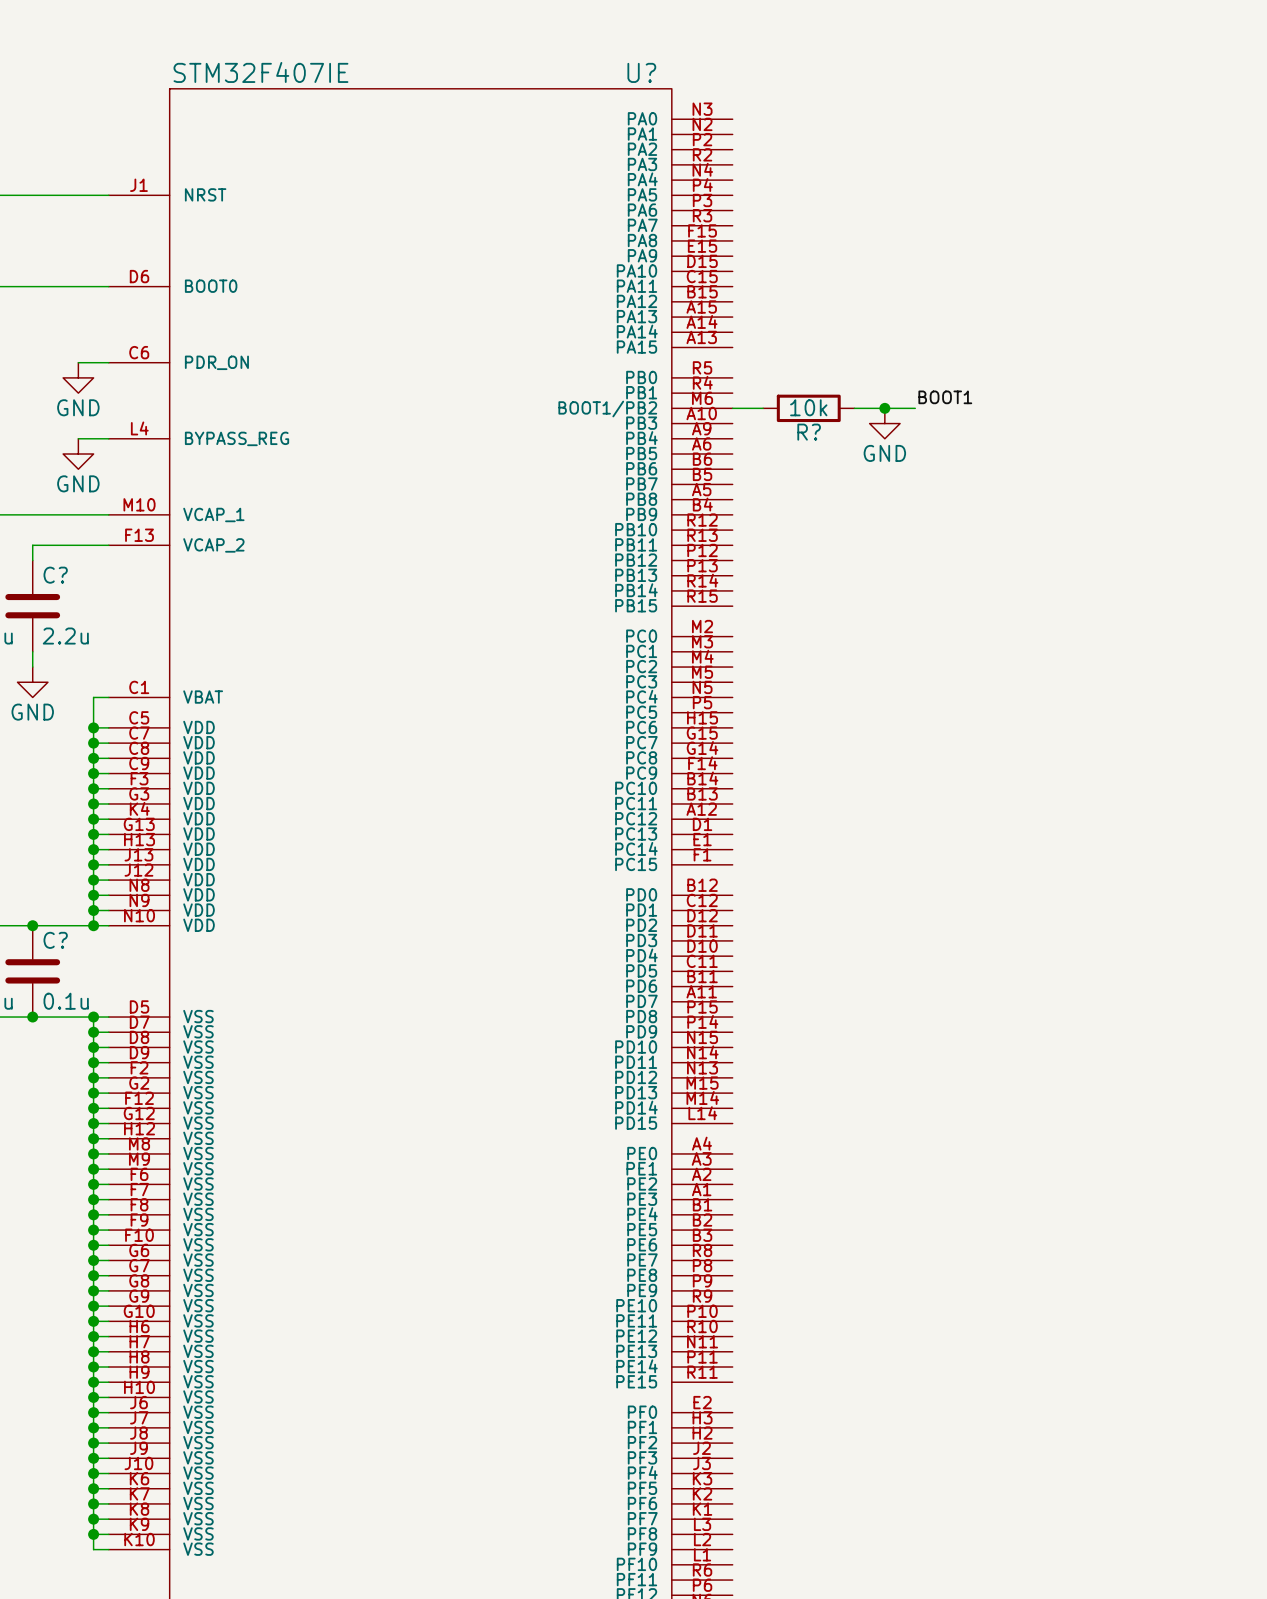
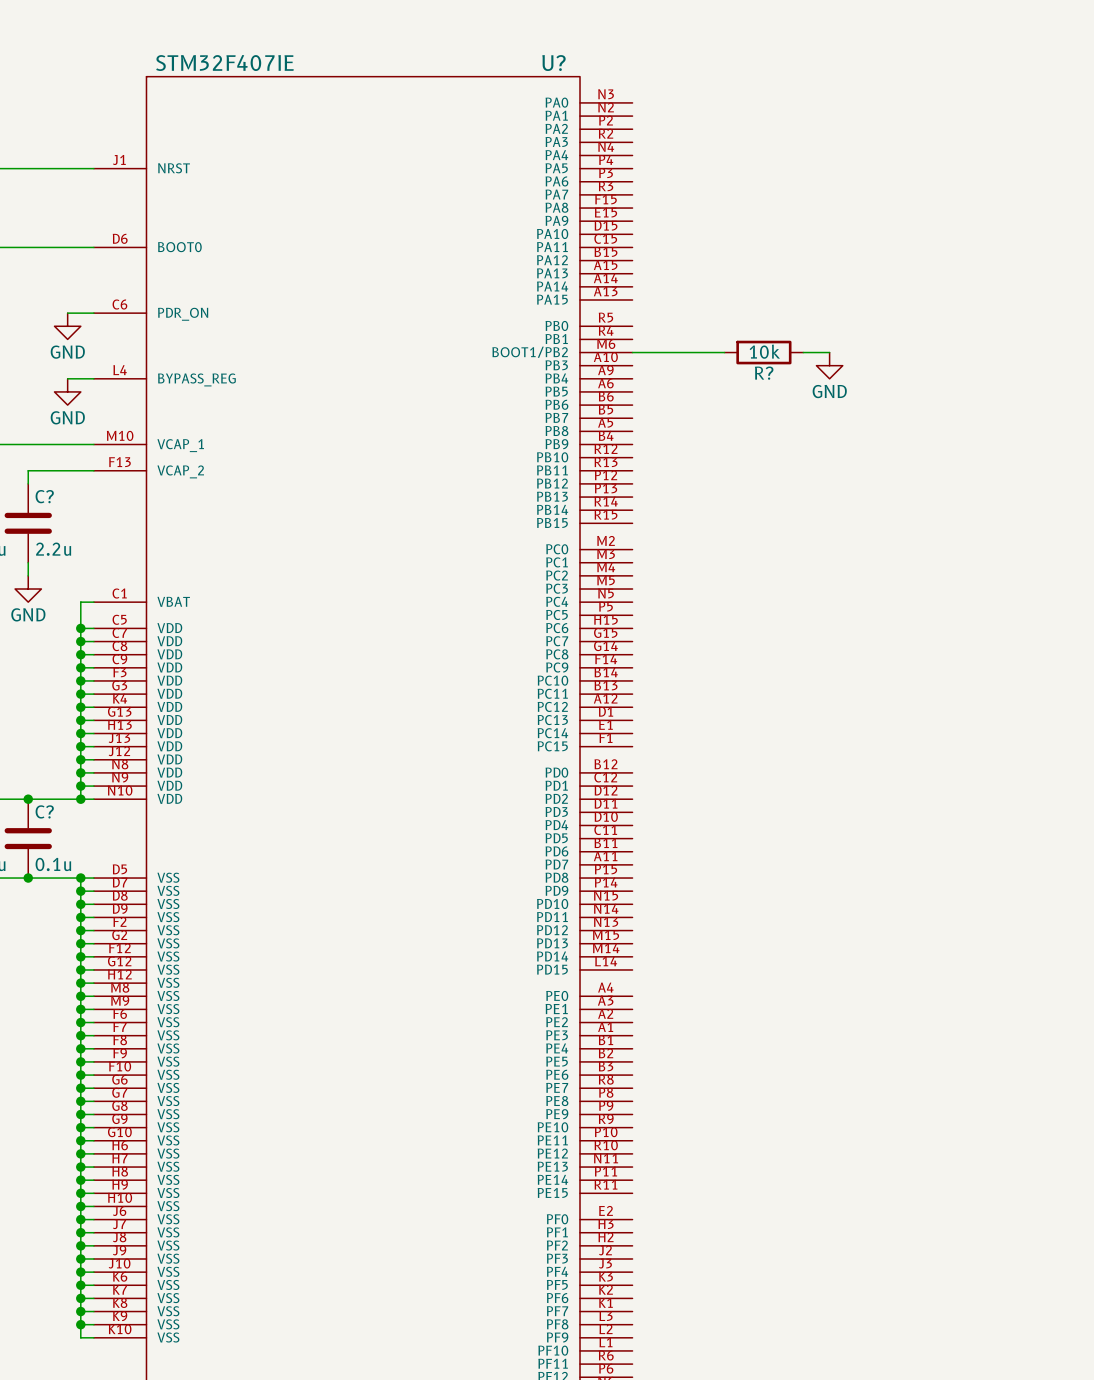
label: BOOT1 (945, 397) -> none
wire: none -> (658, 352) (724, 352)
R? position: (808, 408) -> (763, 352)
wire: (854, 408) (915, 408) -> none
junction: (884, 408) -> none
wire: none -> (803, 352) (829, 352)
power symbol position: GND (884, 423) -> GND (829, 365)

